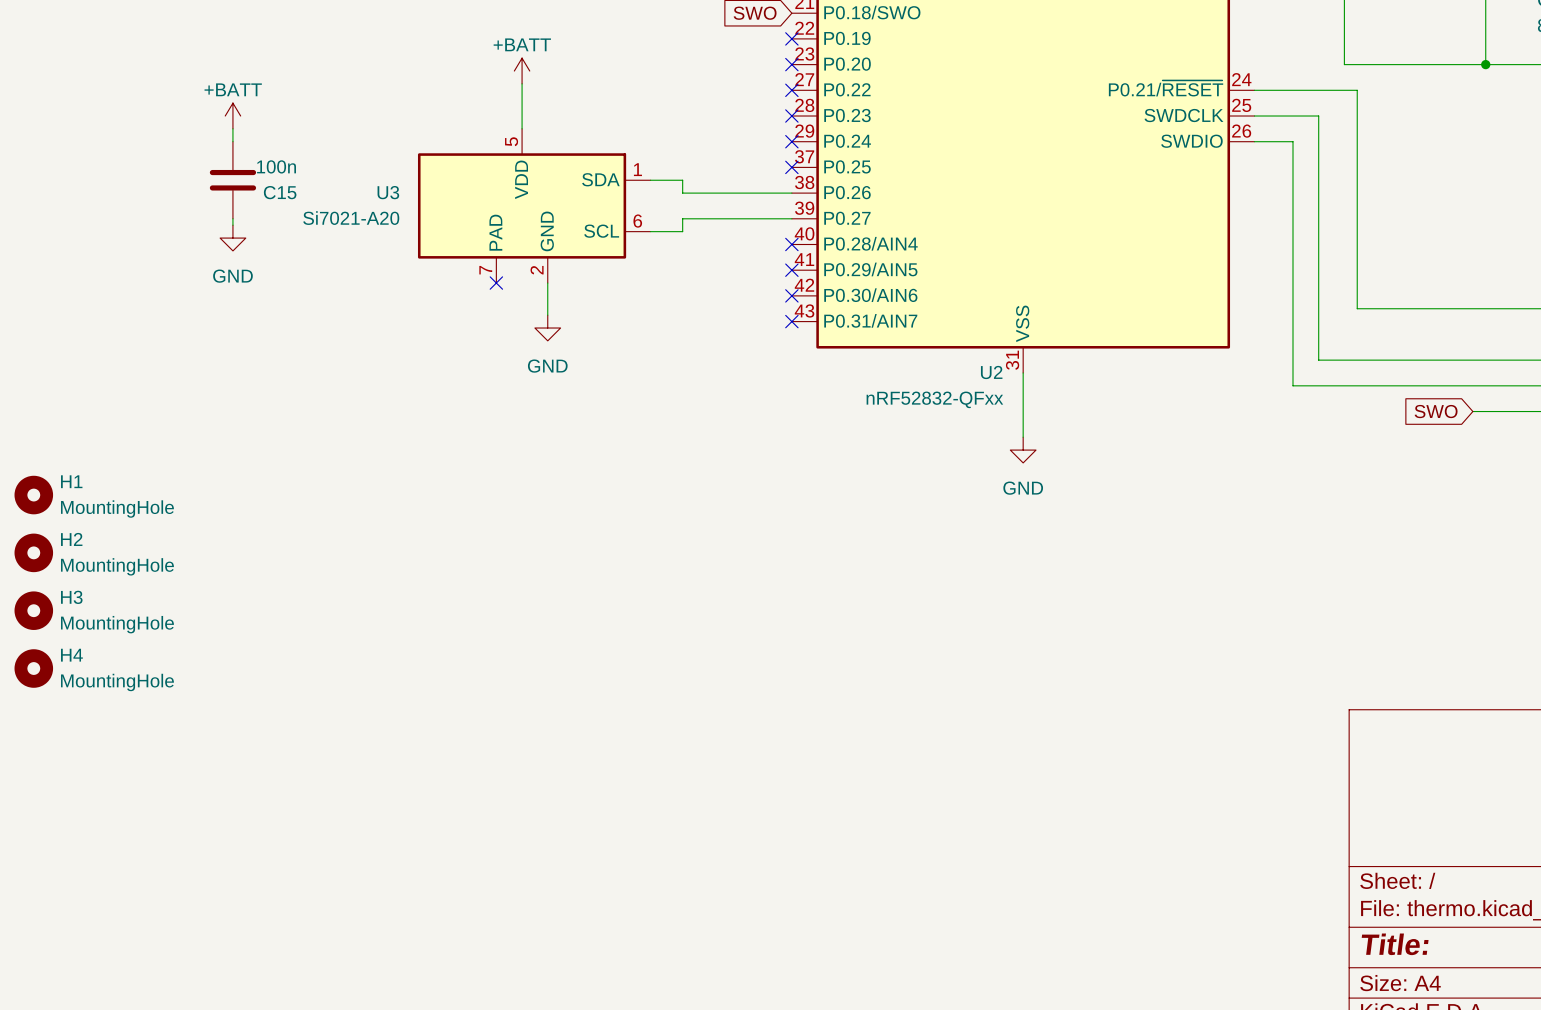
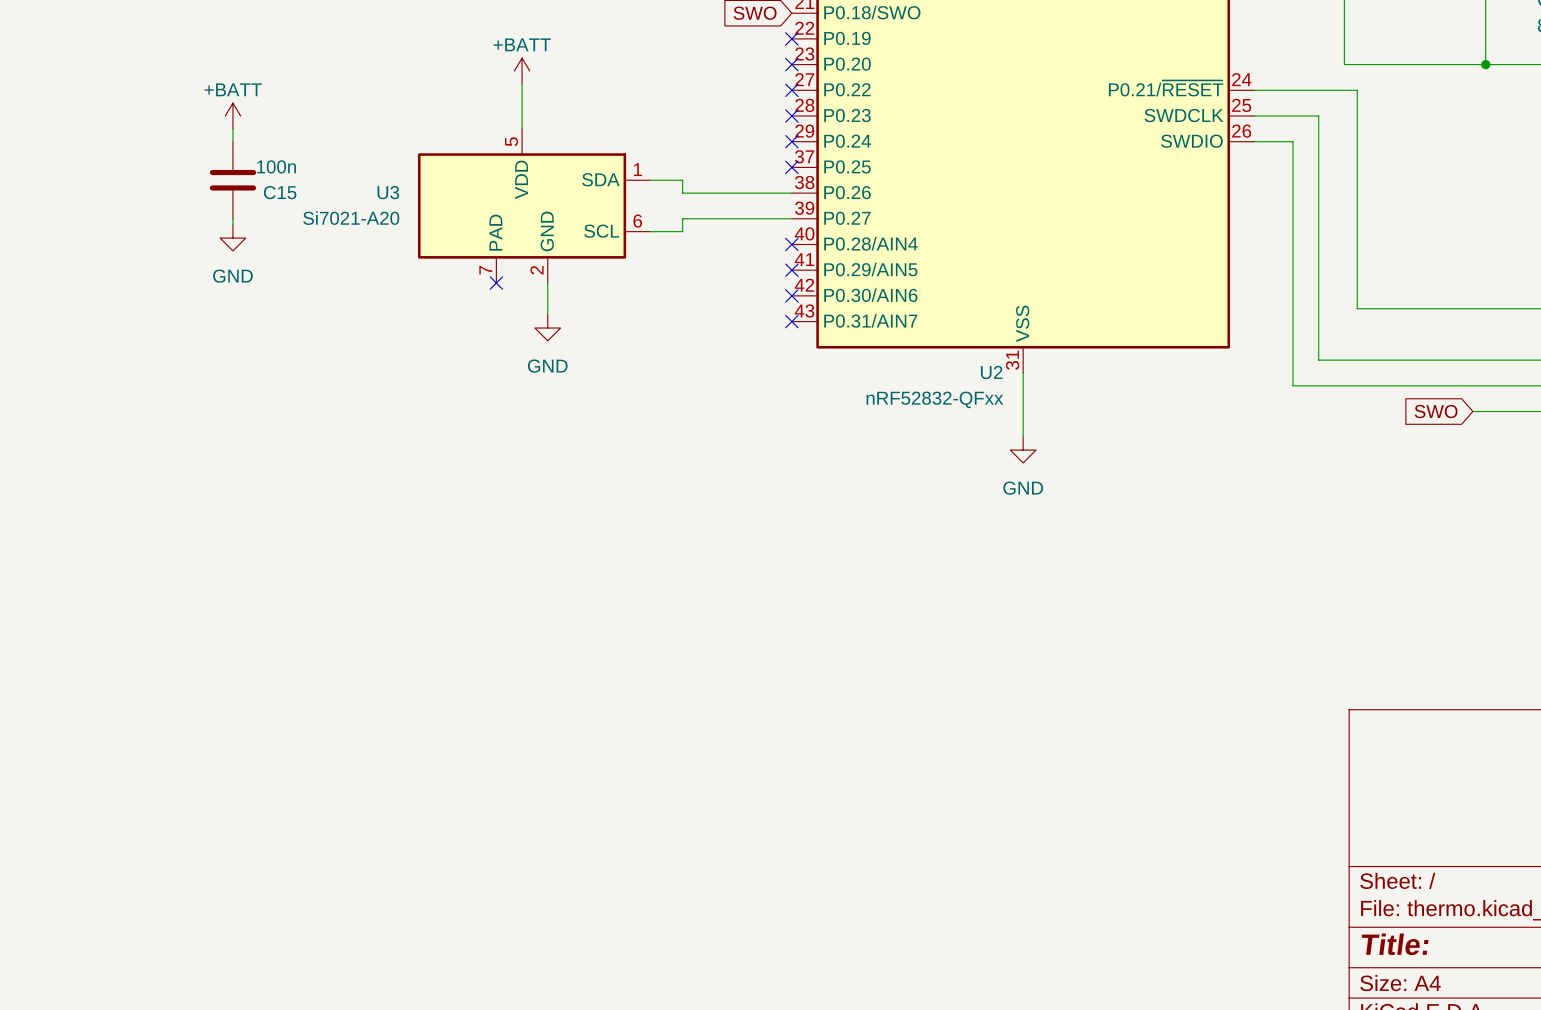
H1: MountingHole (33, 495) -> none
H2: MountingHole (33, 552) -> none
H3: MountingHole (33, 610) -> none
H4: MountingHole (33, 668) -> none

